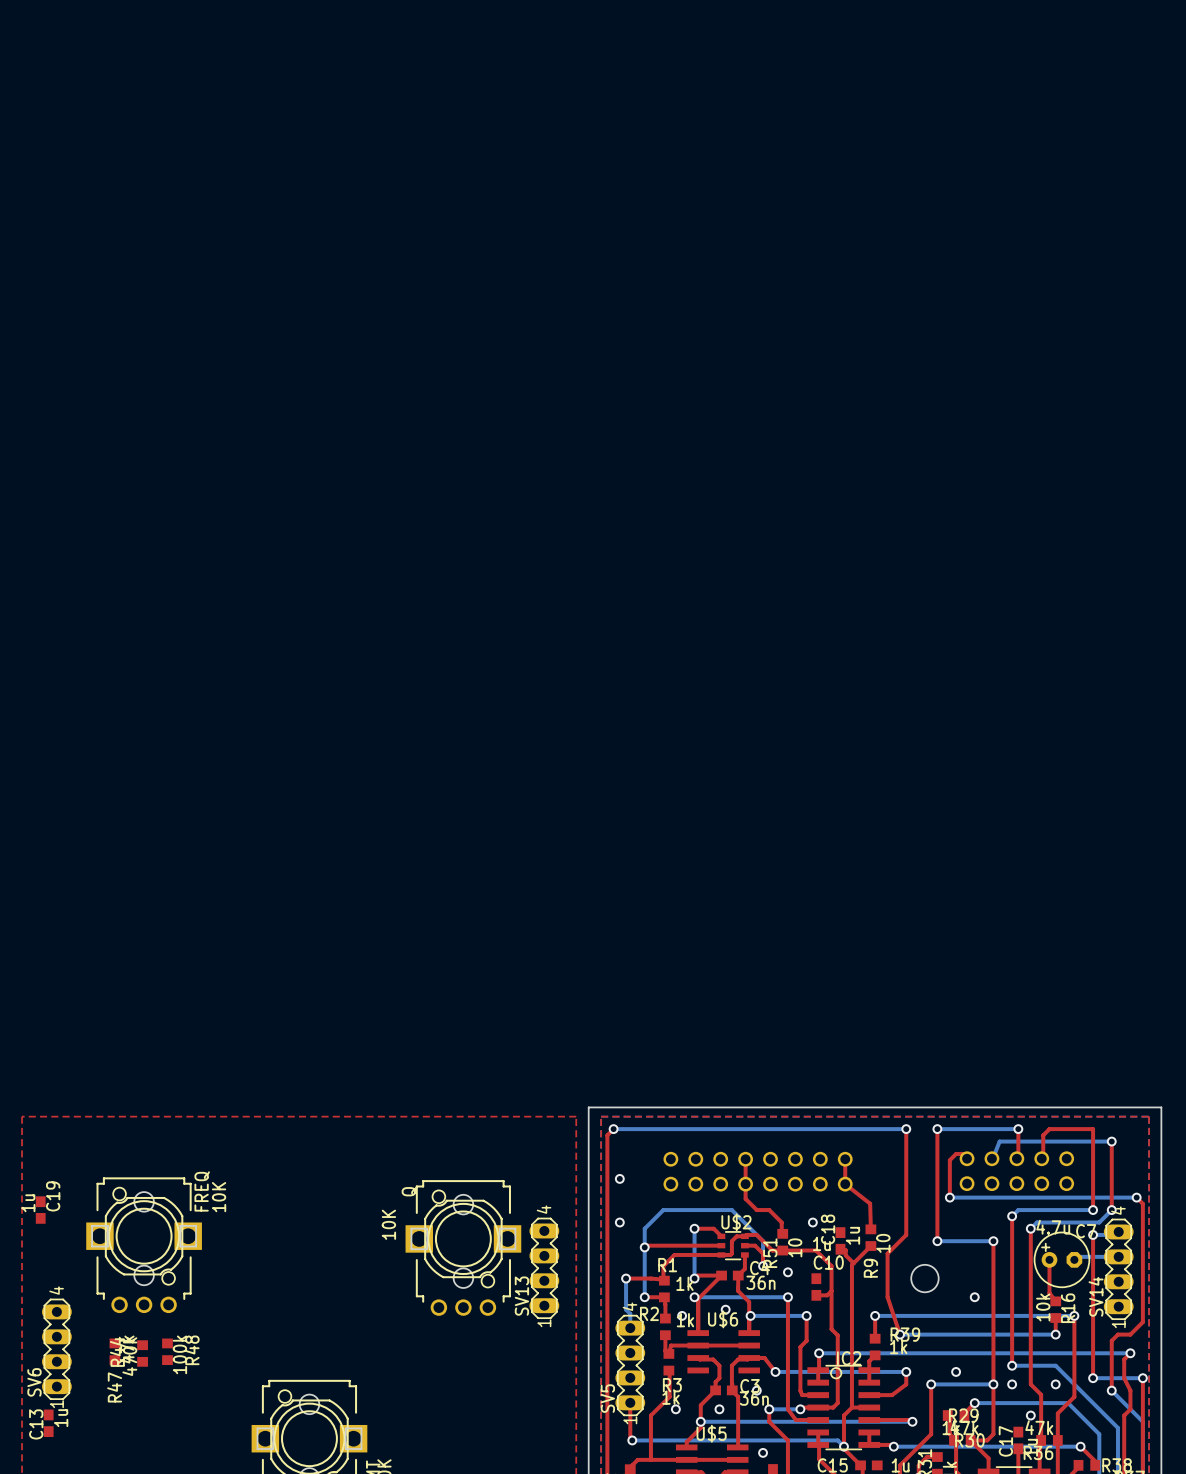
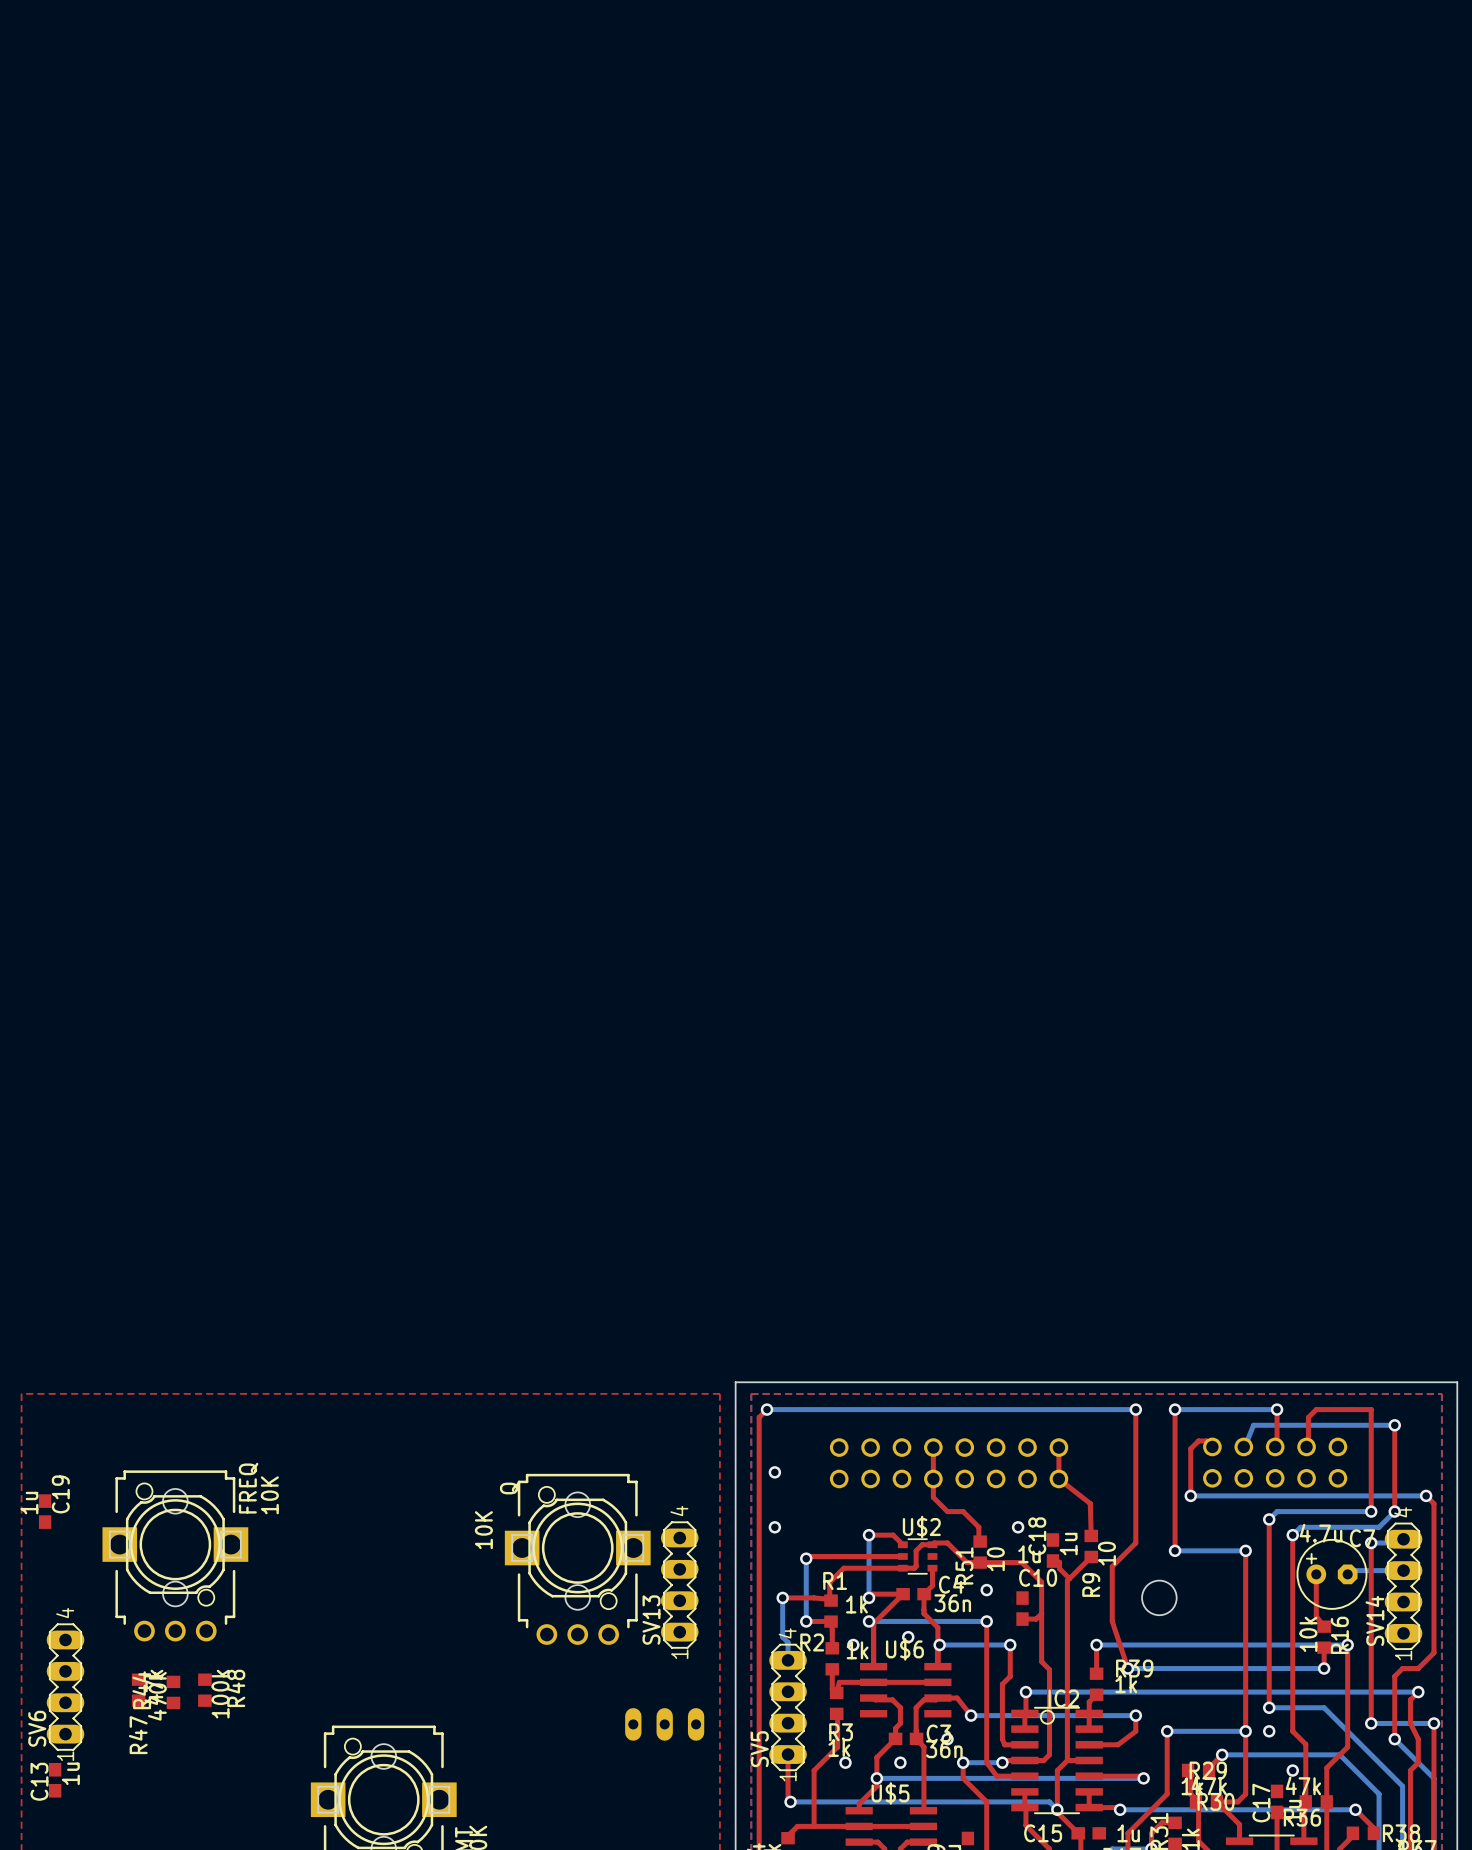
top track: (744, 1245) (755, 1245) (763, 1253) (763, 1266) -> none
bottom track: (644, 1247) (644, 1228) (663, 1210) (731, 1210) (763, 1241) (763, 1266) -> none
via: (763, 1266) -> none
via: (974, 1297) -> none
via: (956, 1371) -> none
part: none -> (664, 1724)
via: (1055, 1384) -> none
via: (763, 1452) -> none

